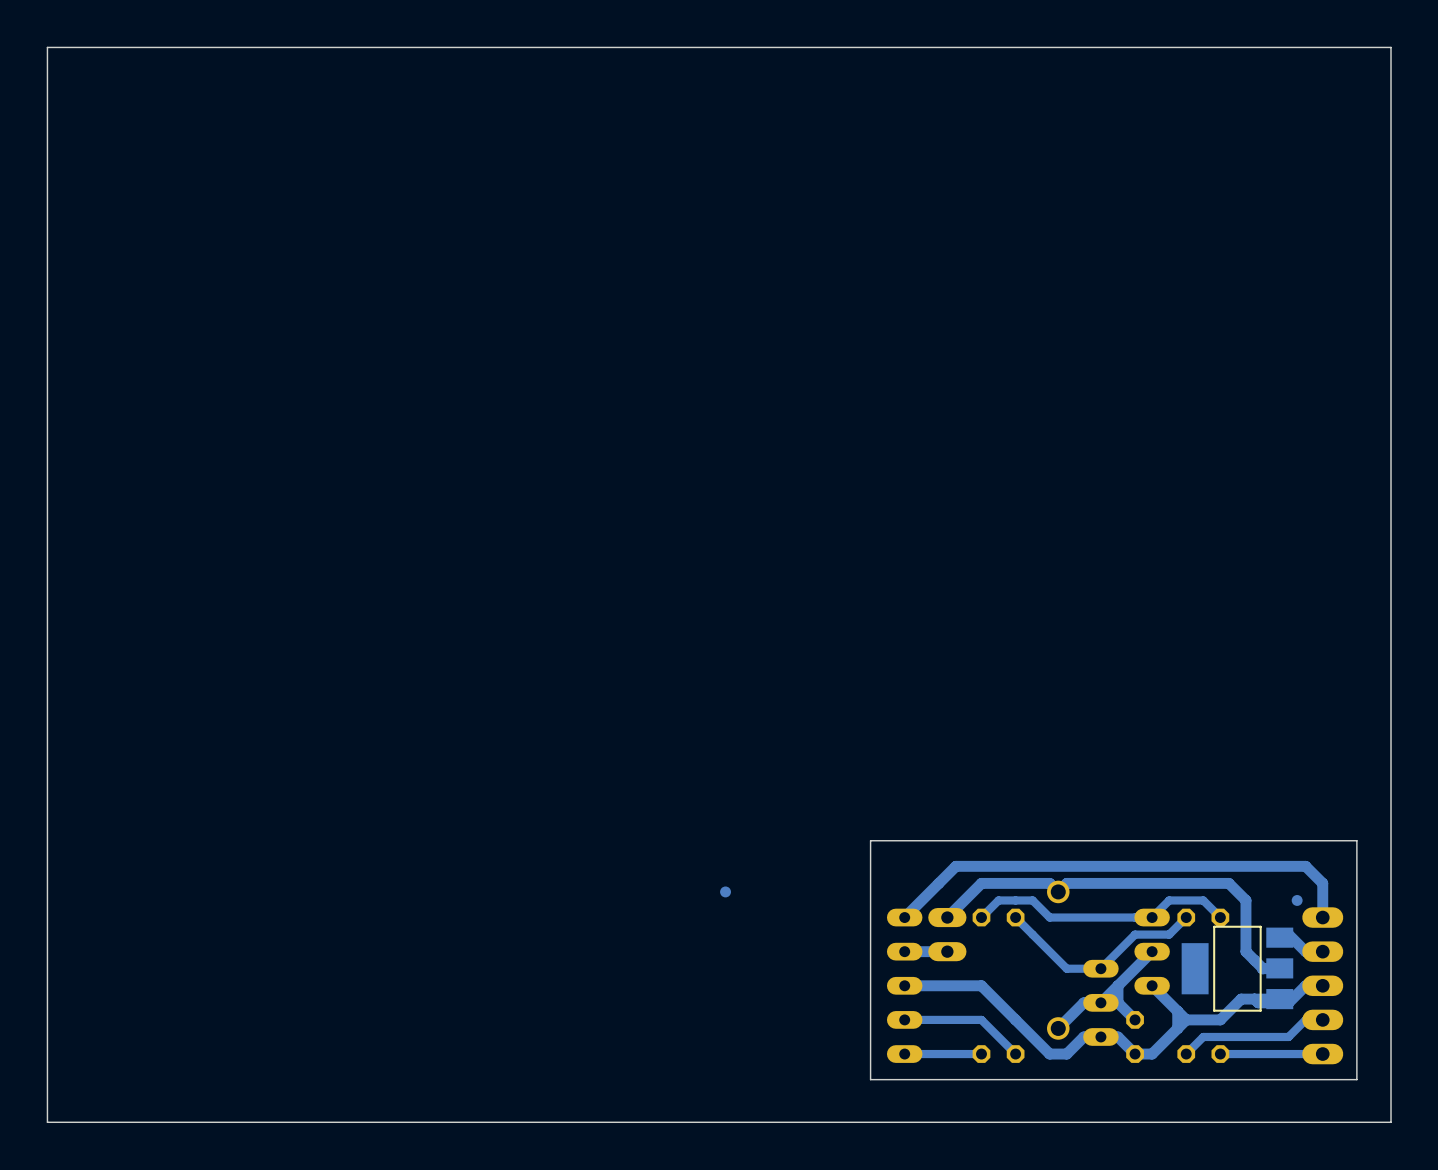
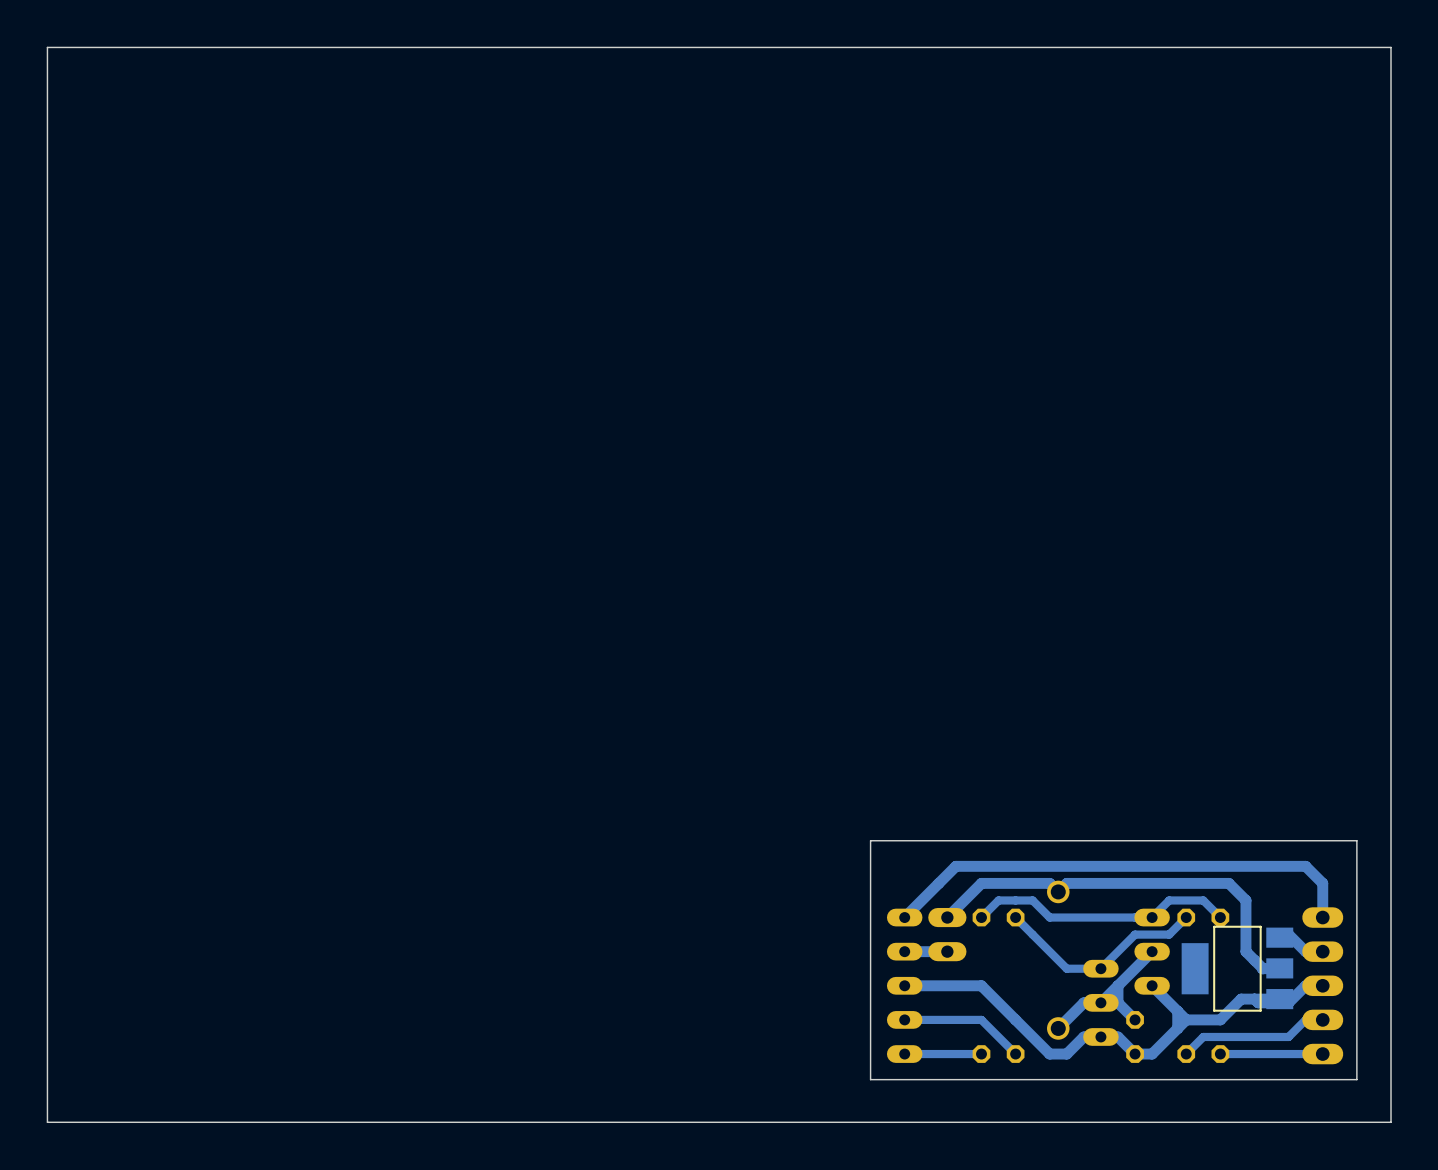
drawing: [720, 886, 732, 898] -> none
drawing: [1291, 895, 1303, 906] -> none

